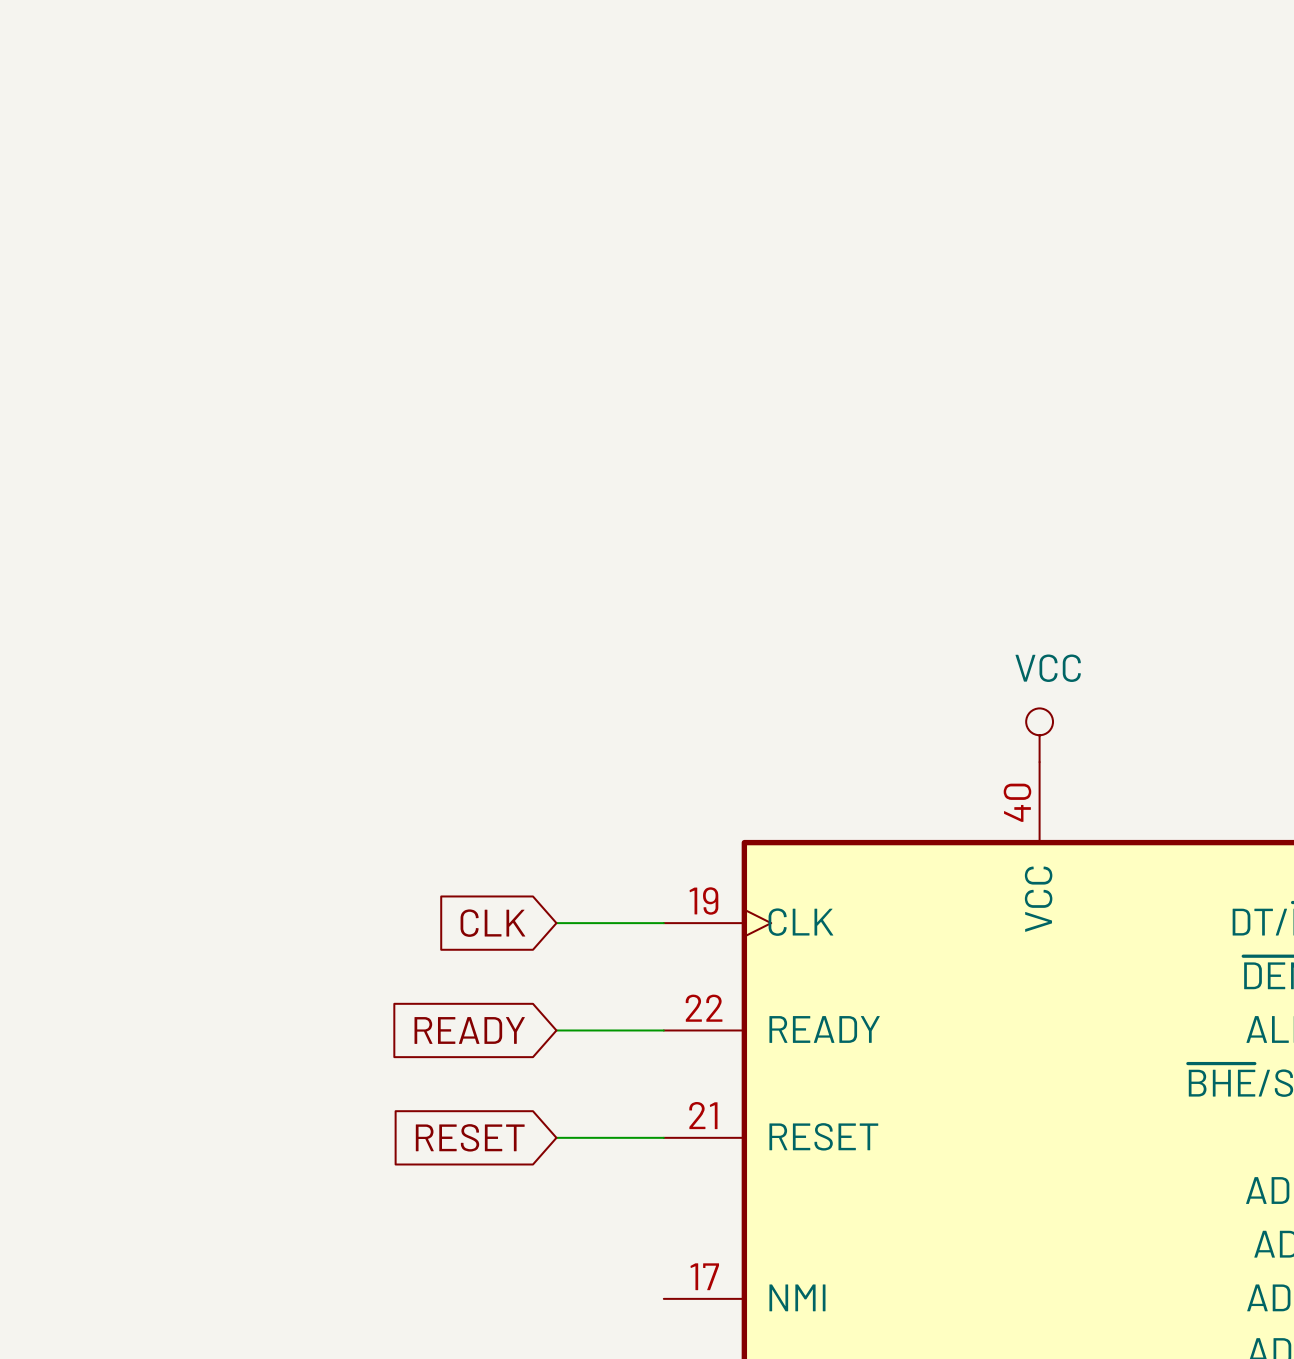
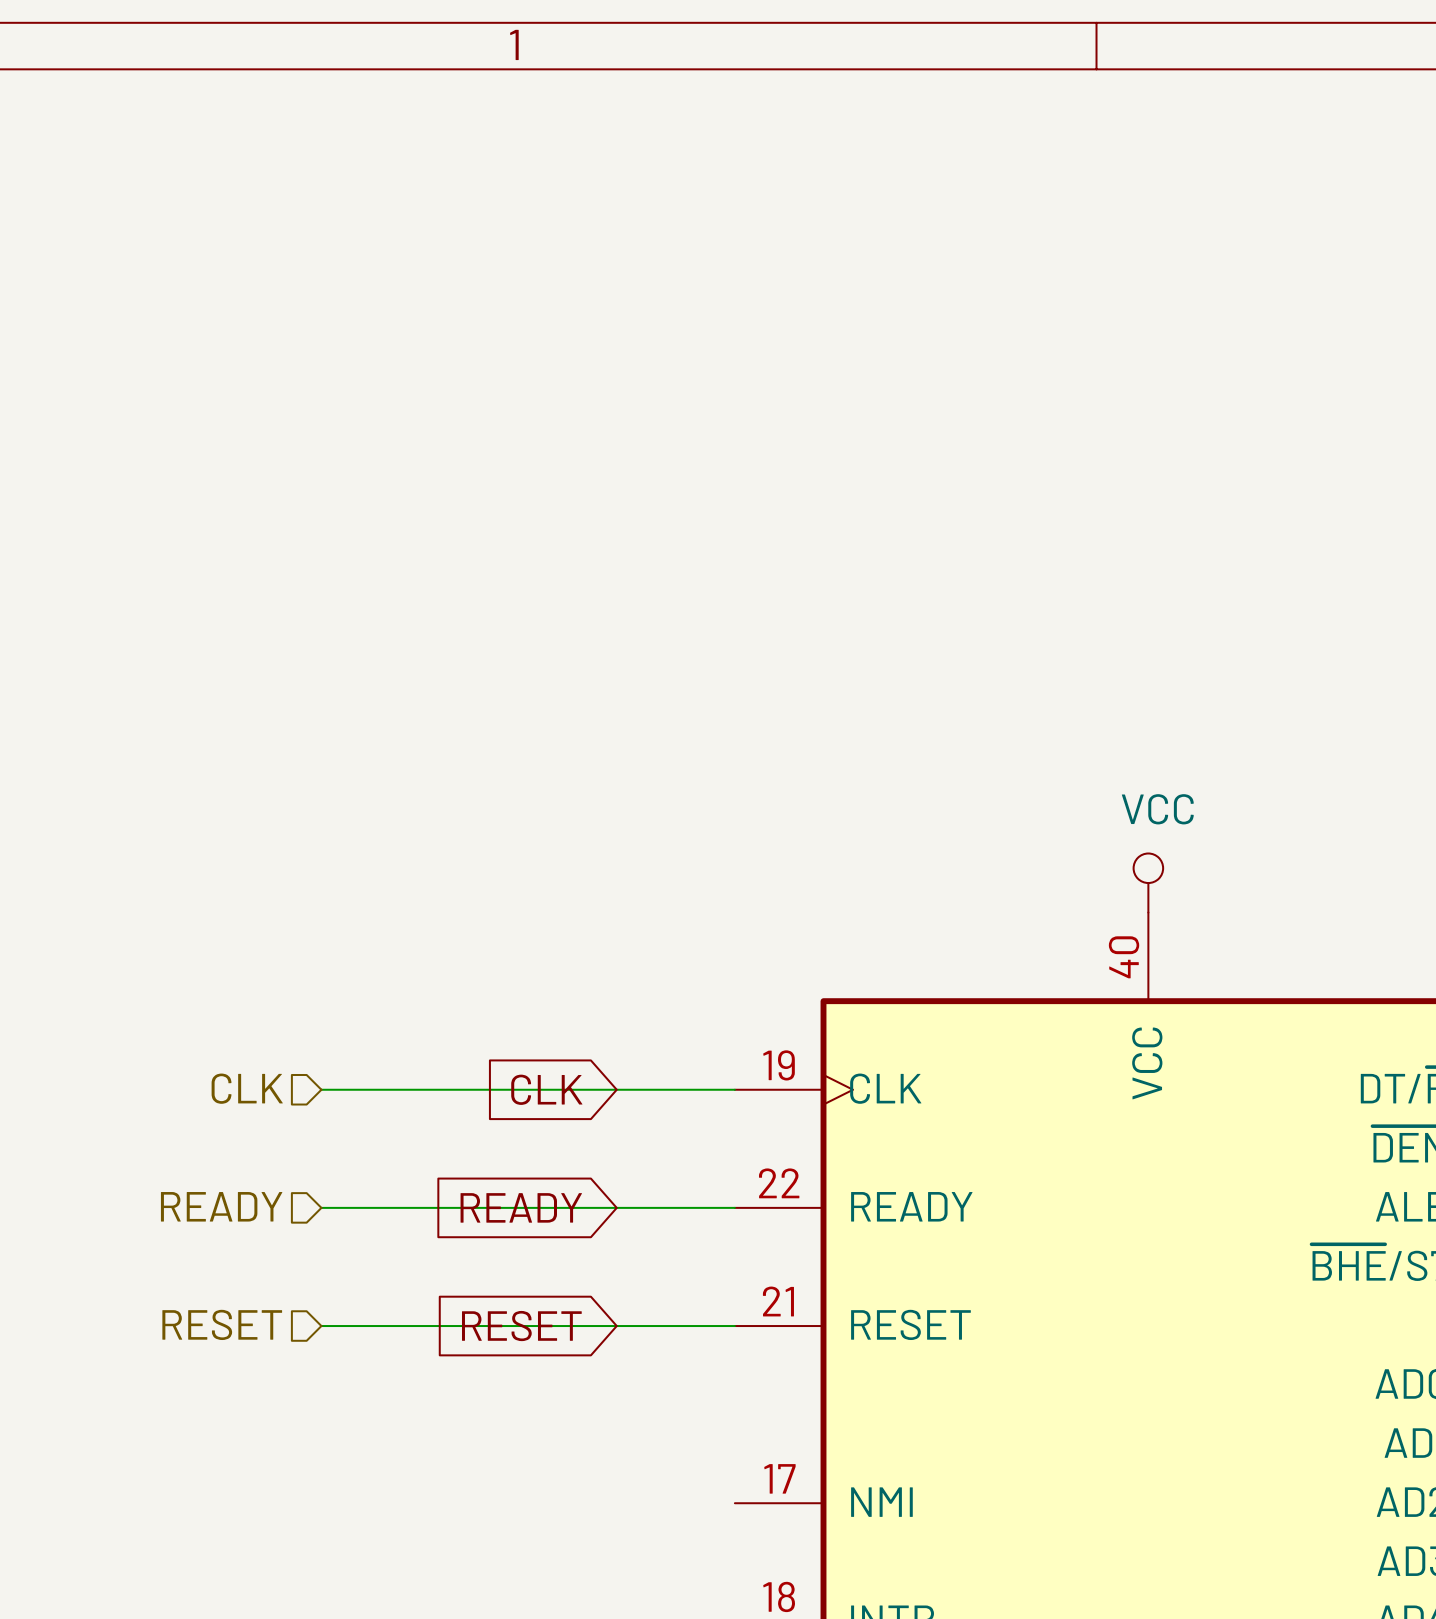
hierarchical label: none -> CLK (247, 1088)
wire: none -> (321, 1089) (616, 1089)
hierarchical label: none -> READY (221, 1206)
wire: none -> (321, 1207) (616, 1207)
hierarchical label: none -> RESET (222, 1324)
wire: none -> (321, 1326) (616, 1326)

